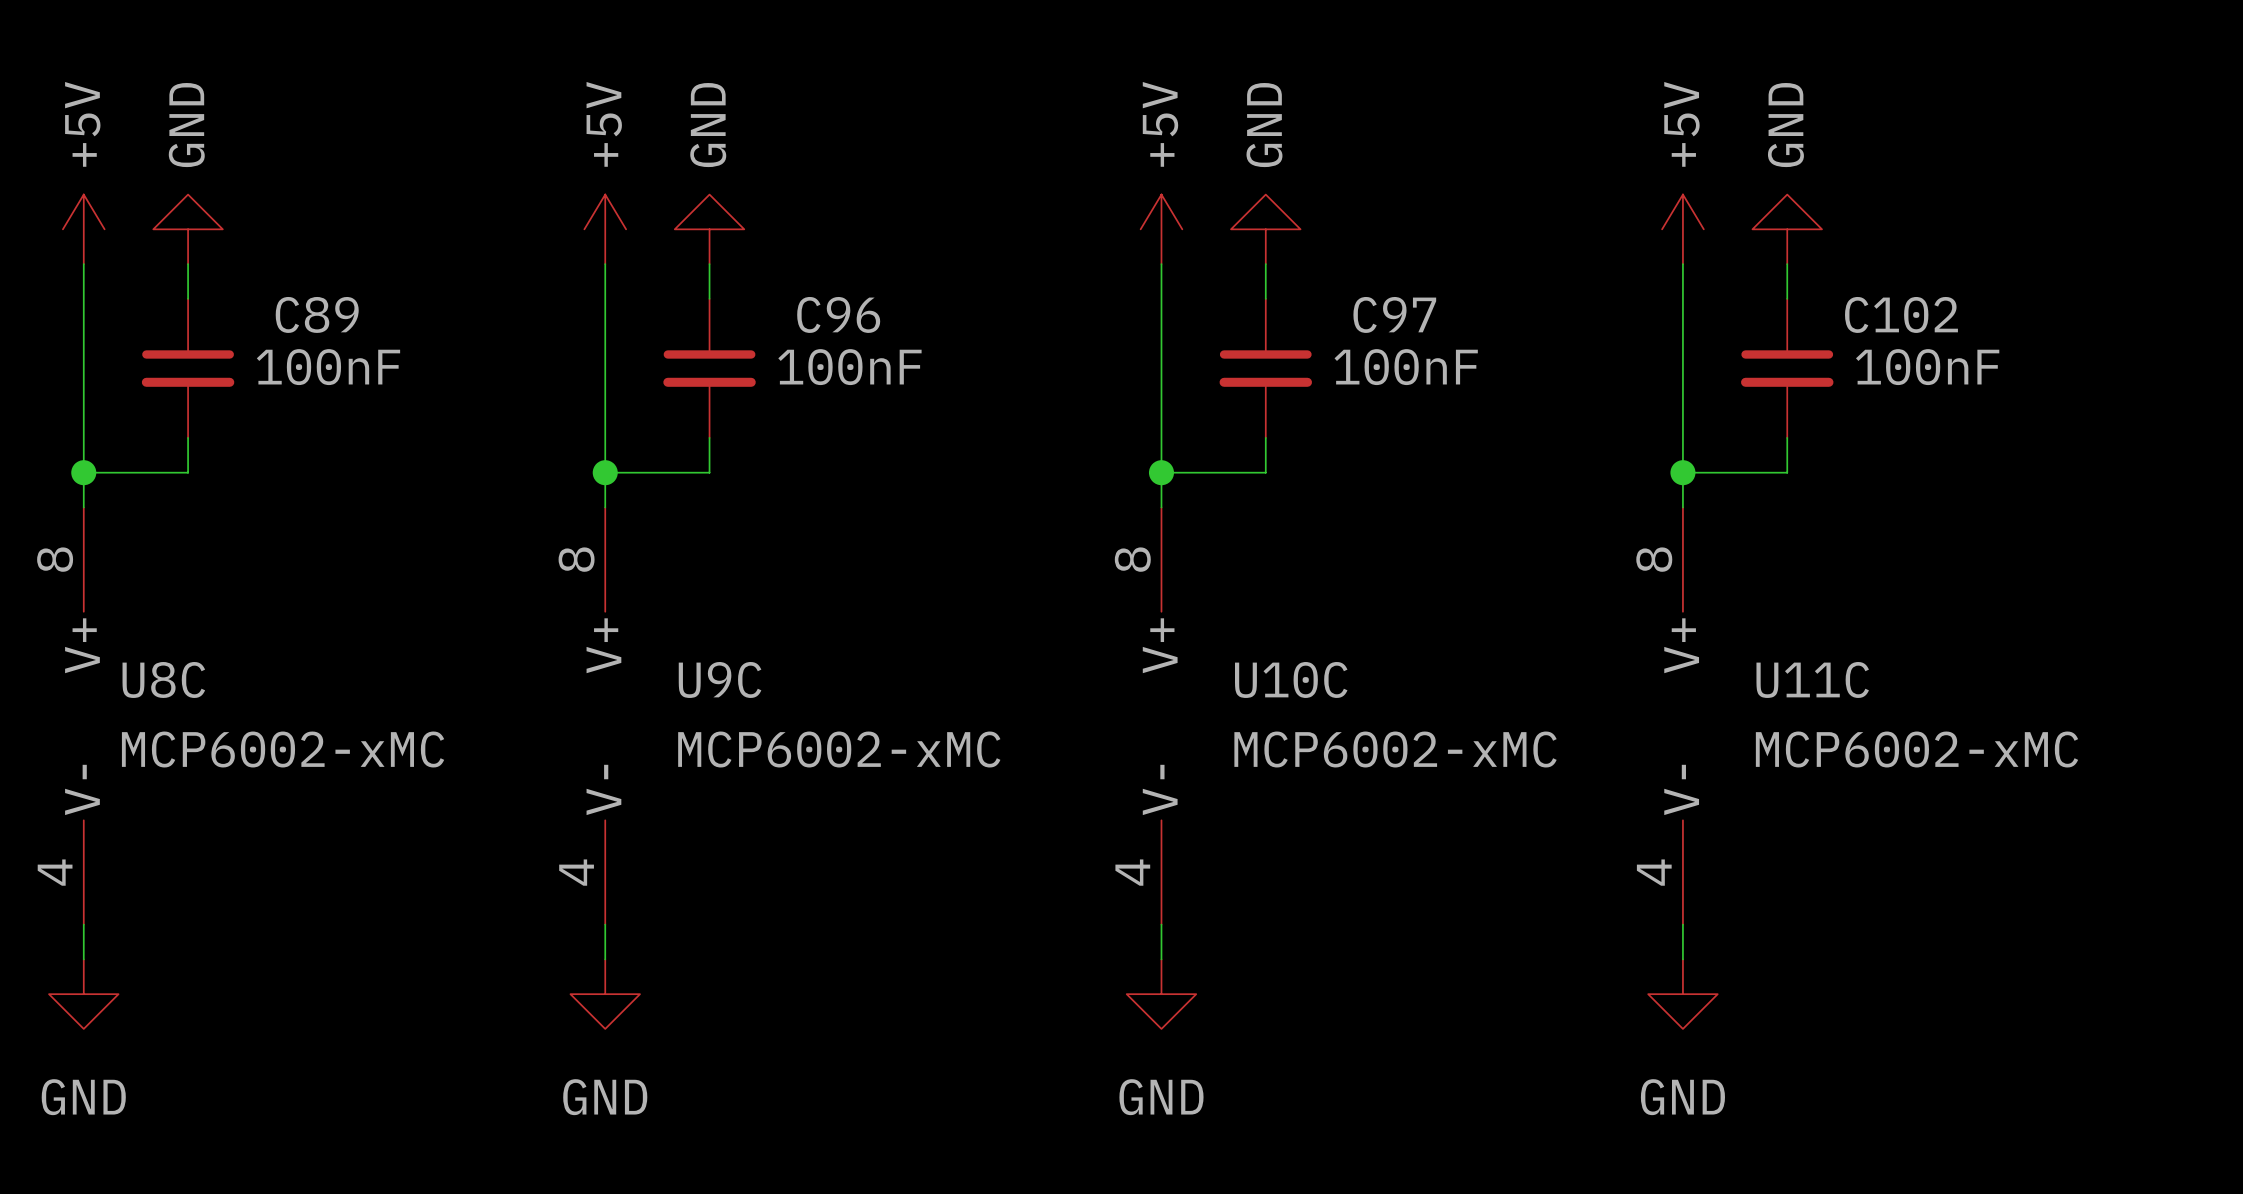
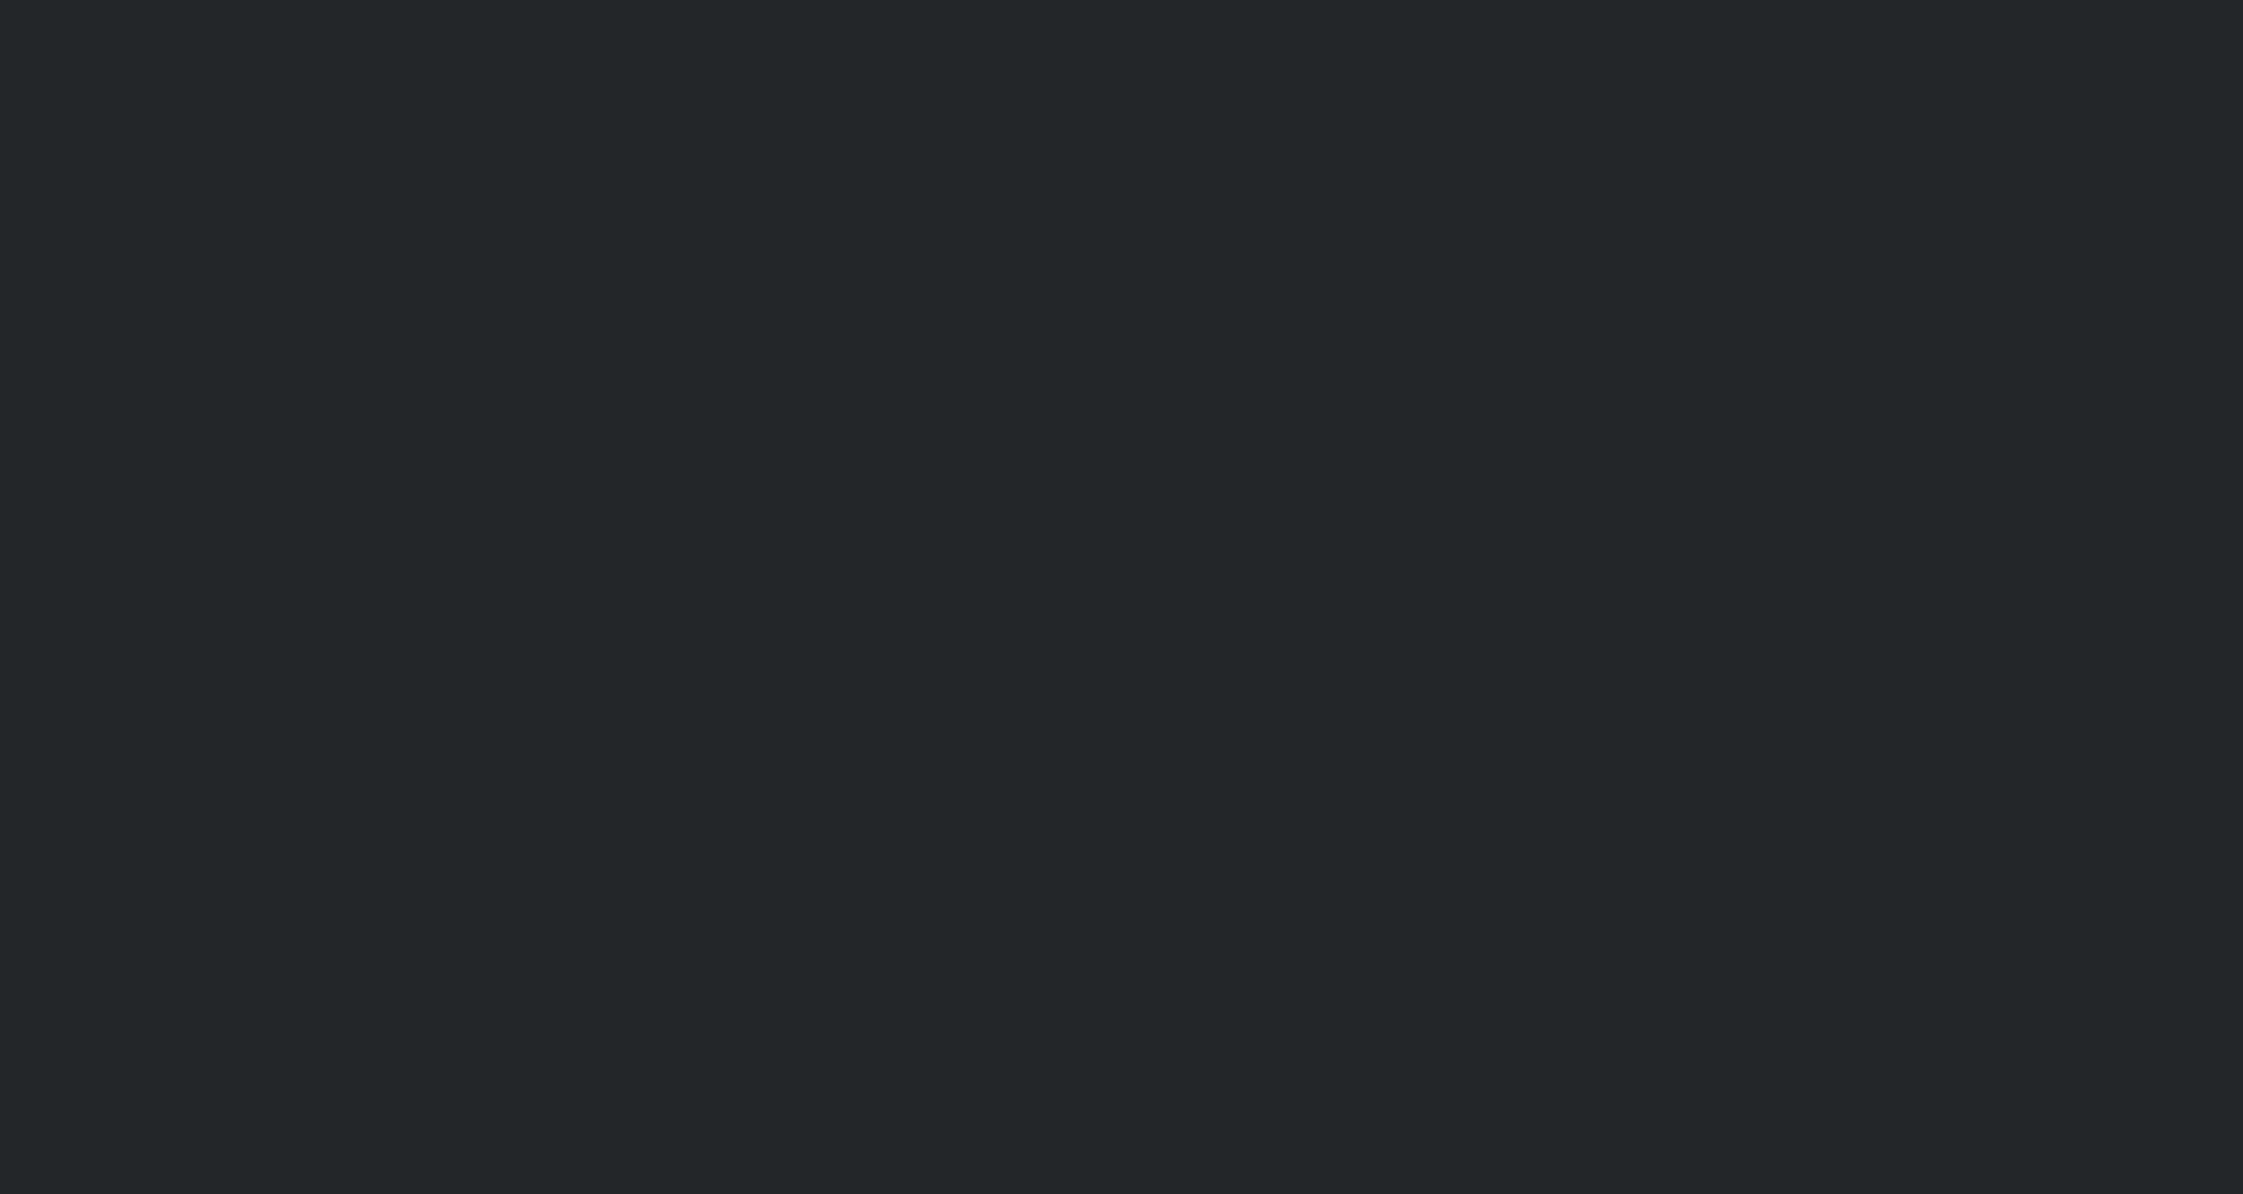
power symbol: +5V (83, 229) -> none
power symbol: GND (188, 229) -> none
power symbol: +5V (605, 229) -> none
power symbol: GND (709, 229) -> none
power symbol: +5V (1161, 229) -> none
power symbol: GND (1265, 229) -> none
power symbol: +5V (1682, 229) -> none
power symbol: GND (1787, 229) -> none
wire: (83, 264) (83, 507) -> none
wire: (188, 264) (188, 298) -> none
wire: (605, 264) (605, 507) -> none
wire: (709, 264) (709, 298) -> none
wire: (1161, 264) (1161, 507) -> none
wire: (1265, 264) (1265, 298) -> none
wire: (1682, 264) (1682, 507) -> none
wire: (1787, 264) (1787, 298) -> none
C89: 100nF (188, 368) -> none
C96: 100nF (709, 368) -> none
C97: 100nF (1265, 368) -> none
C102: 100nF (1787, 368) -> none
wire: (188, 437) (188, 472) (83, 472) -> none
wire: (709, 437) (709, 472) (605, 472) -> none
wire: (1265, 437) (1265, 472) (1161, 472) -> none
wire: (1787, 437) (1787, 472) (1682, 472) -> none
junction: (83, 472) -> none
junction: (605, 472) -> none
junction: (1161, 472) -> none
junction: (1682, 472) -> none
U8C: MCP6002-xMC (83, 716) -> none
U9C: MCP6002-xMC (605, 716) -> none
U10C: MCP6002-xMC (1161, 716) -> none
U11C: MCP6002-xMC (1682, 716) -> none
wire: (83, 924) (83, 959) -> none
wire: (605, 924) (605, 959) -> none
wire: (1161, 924) (1161, 959) -> none
wire: (1682, 924) (1682, 959) -> none
power symbol: GND (83, 994) -> none
power symbol: GND (605, 994) -> none
power symbol: GND (1161, 994) -> none
power symbol: GND (1682, 994) -> none

